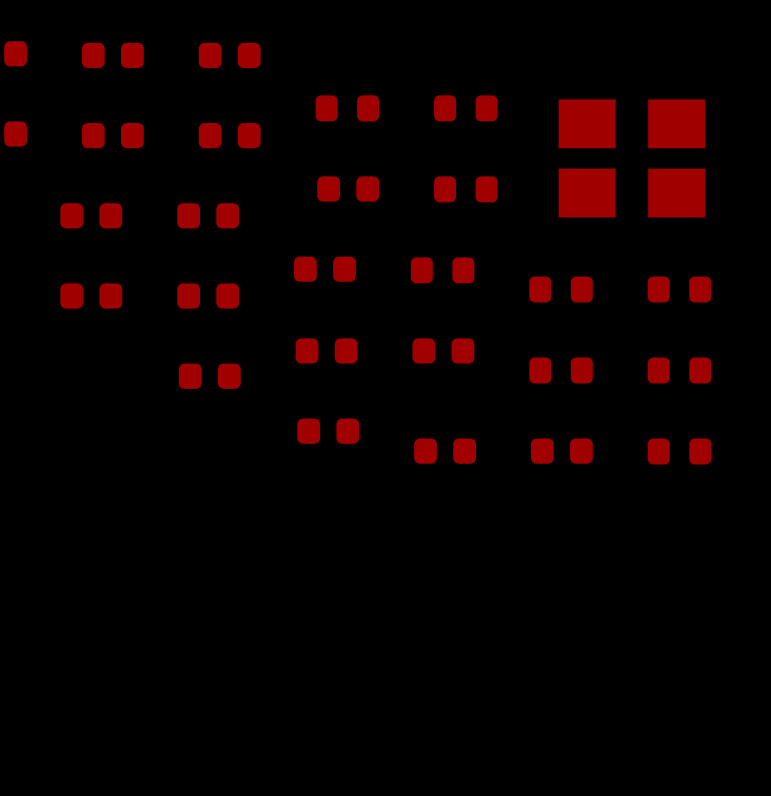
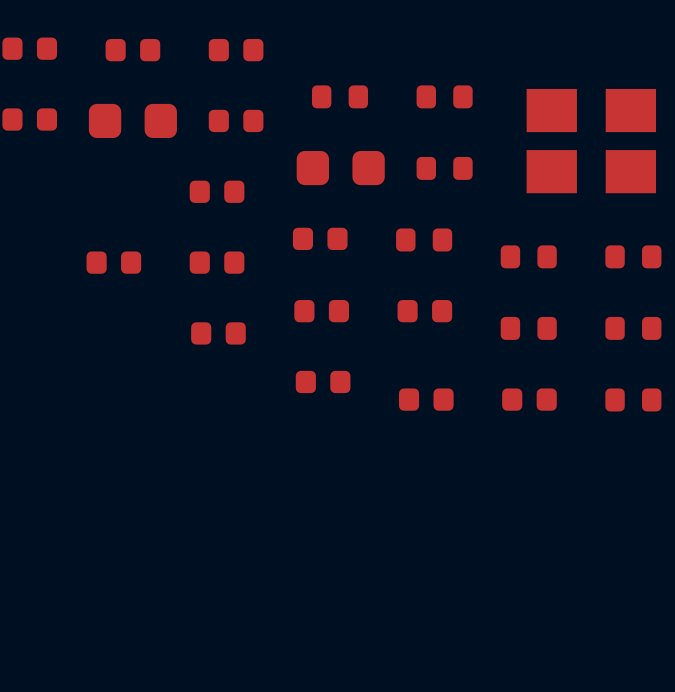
part footprint: [81, 123, 144, 149] -> [88, 103, 177, 139]
part footprint: [317, 176, 380, 202] -> [296, 150, 385, 186]
part: (91, 215) -> none

